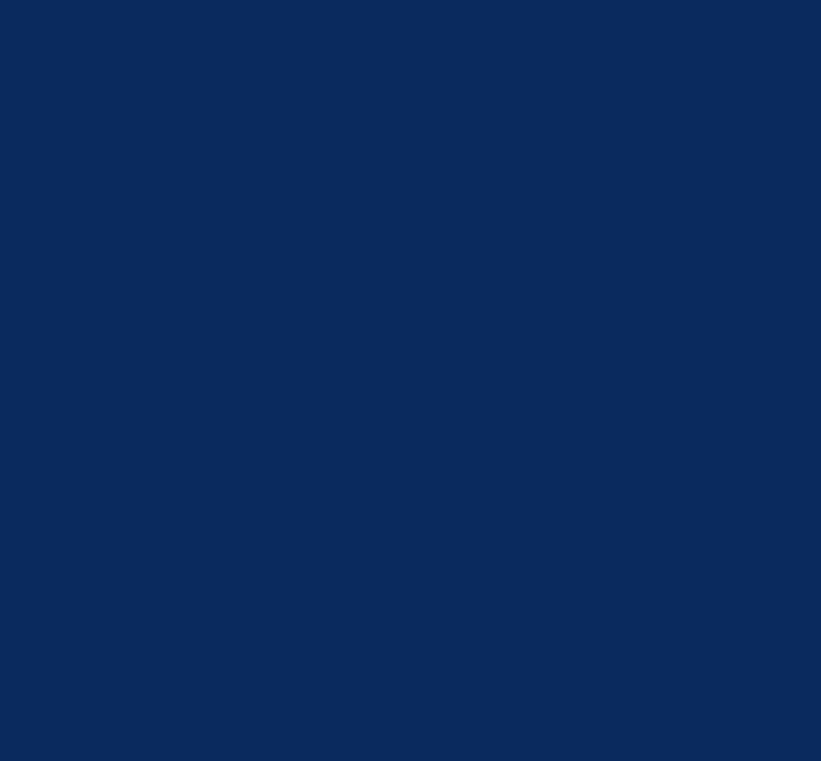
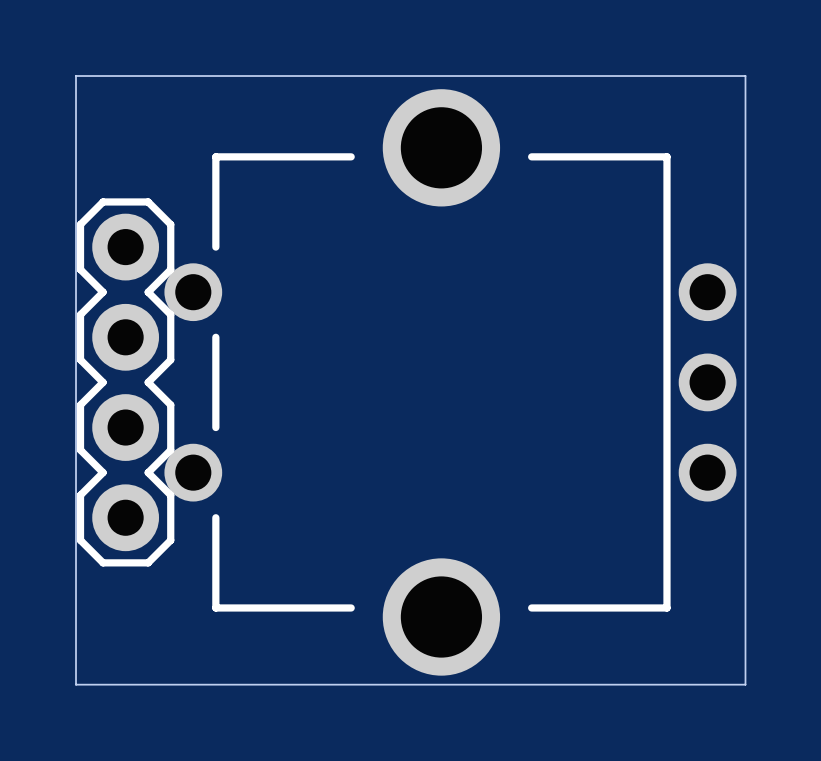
board edge: none -> (76, 76) (745, 76) (745, 684) (76, 684) (76, 76)
part: none -> (125, 382)
part: none -> (450, 382)

